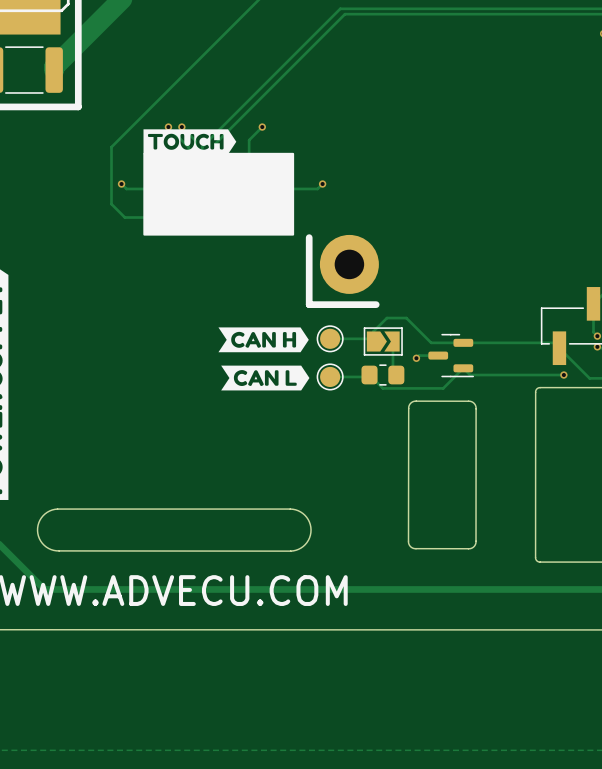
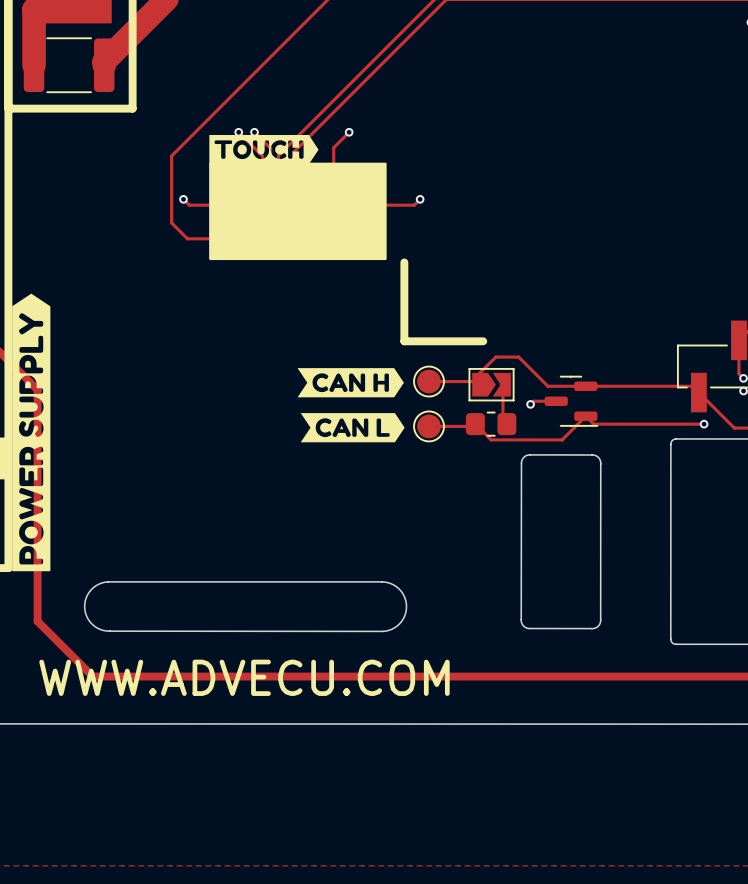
part: (349, 264) -> none

